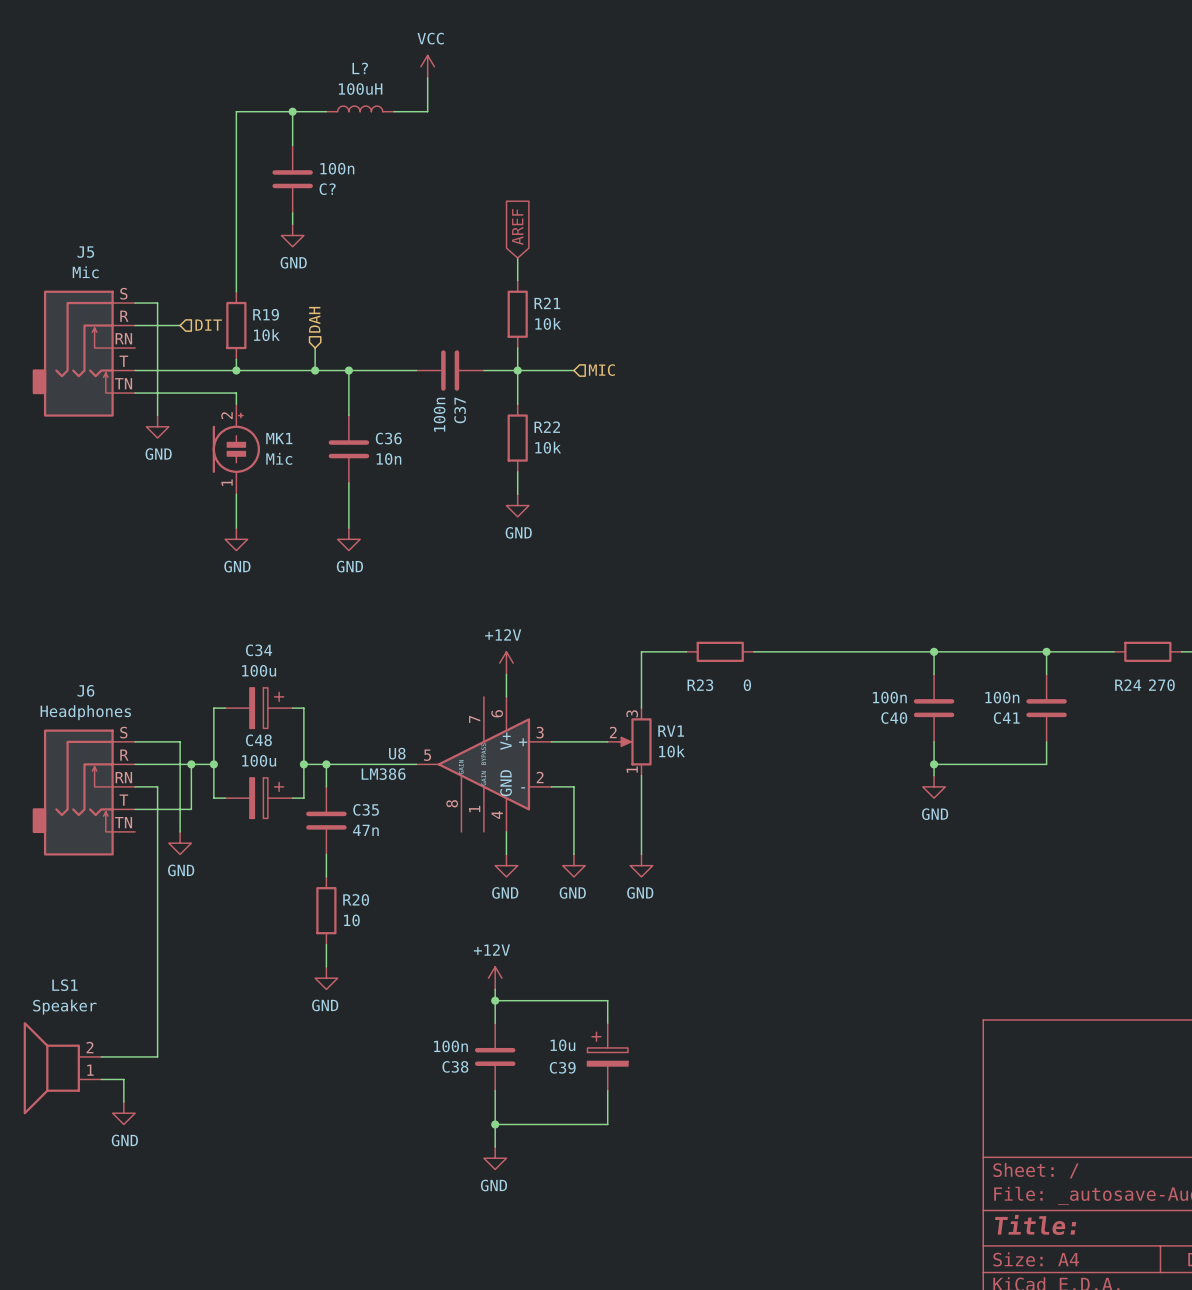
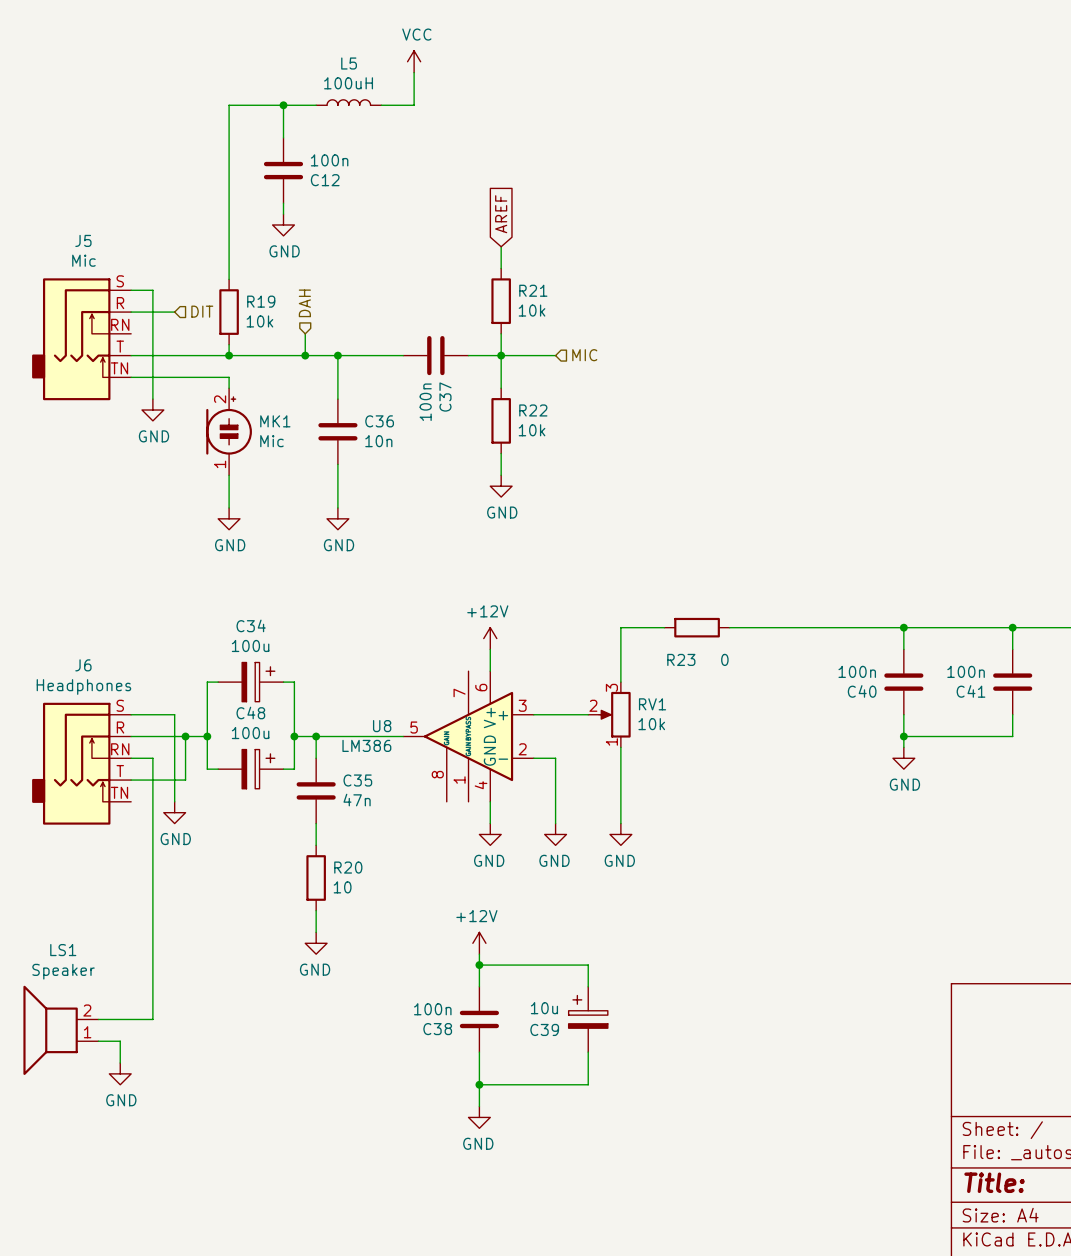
L? name: L? (360, 68) -> L5 (349, 63)
C? name: C? (327, 189) -> C12 (325, 180)

